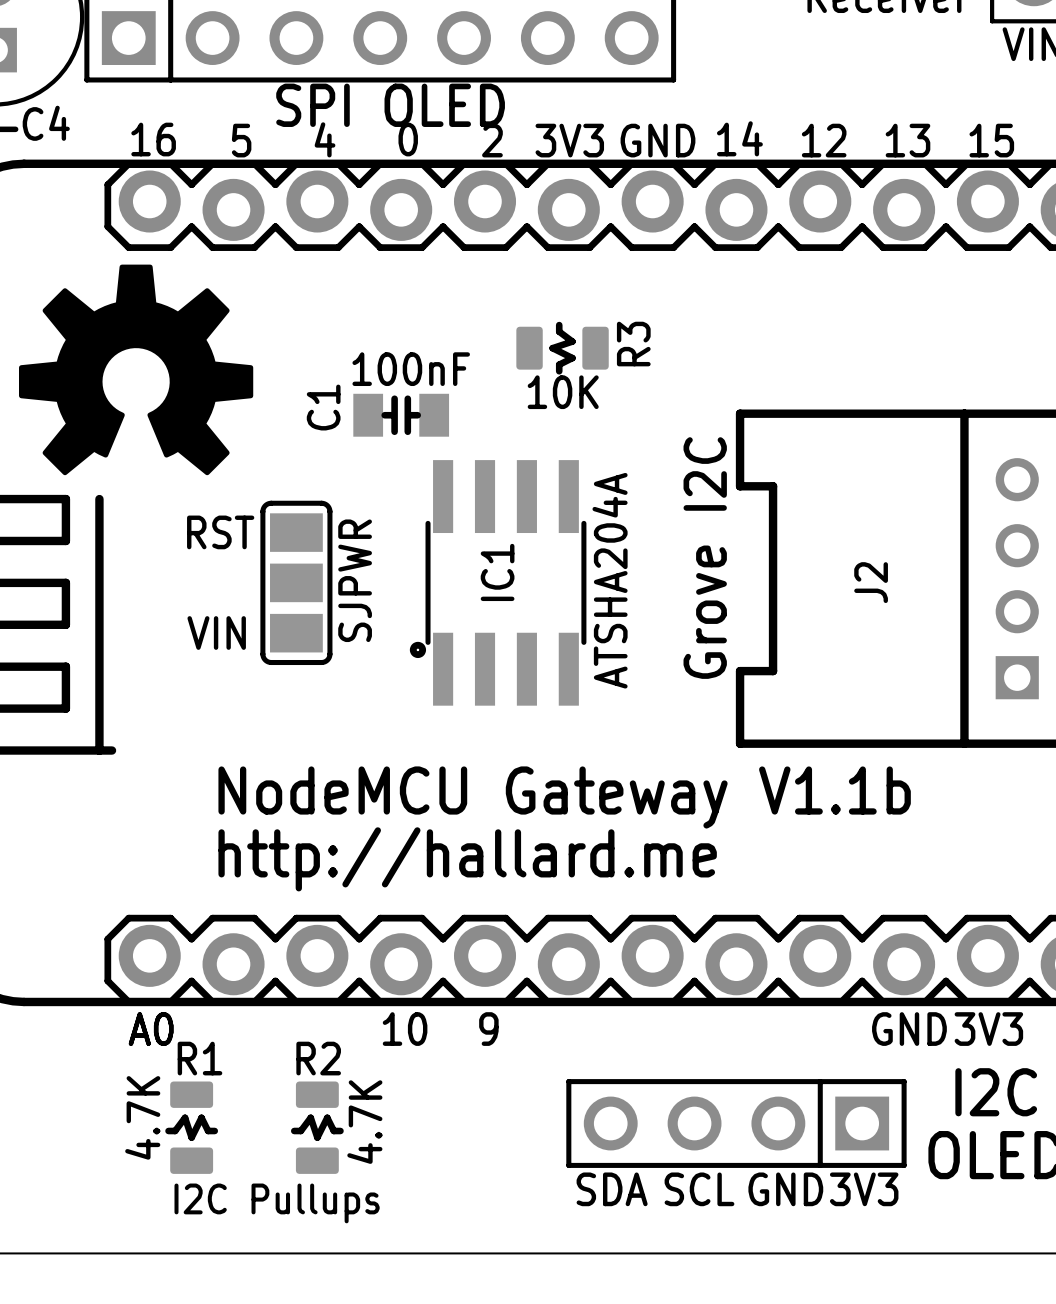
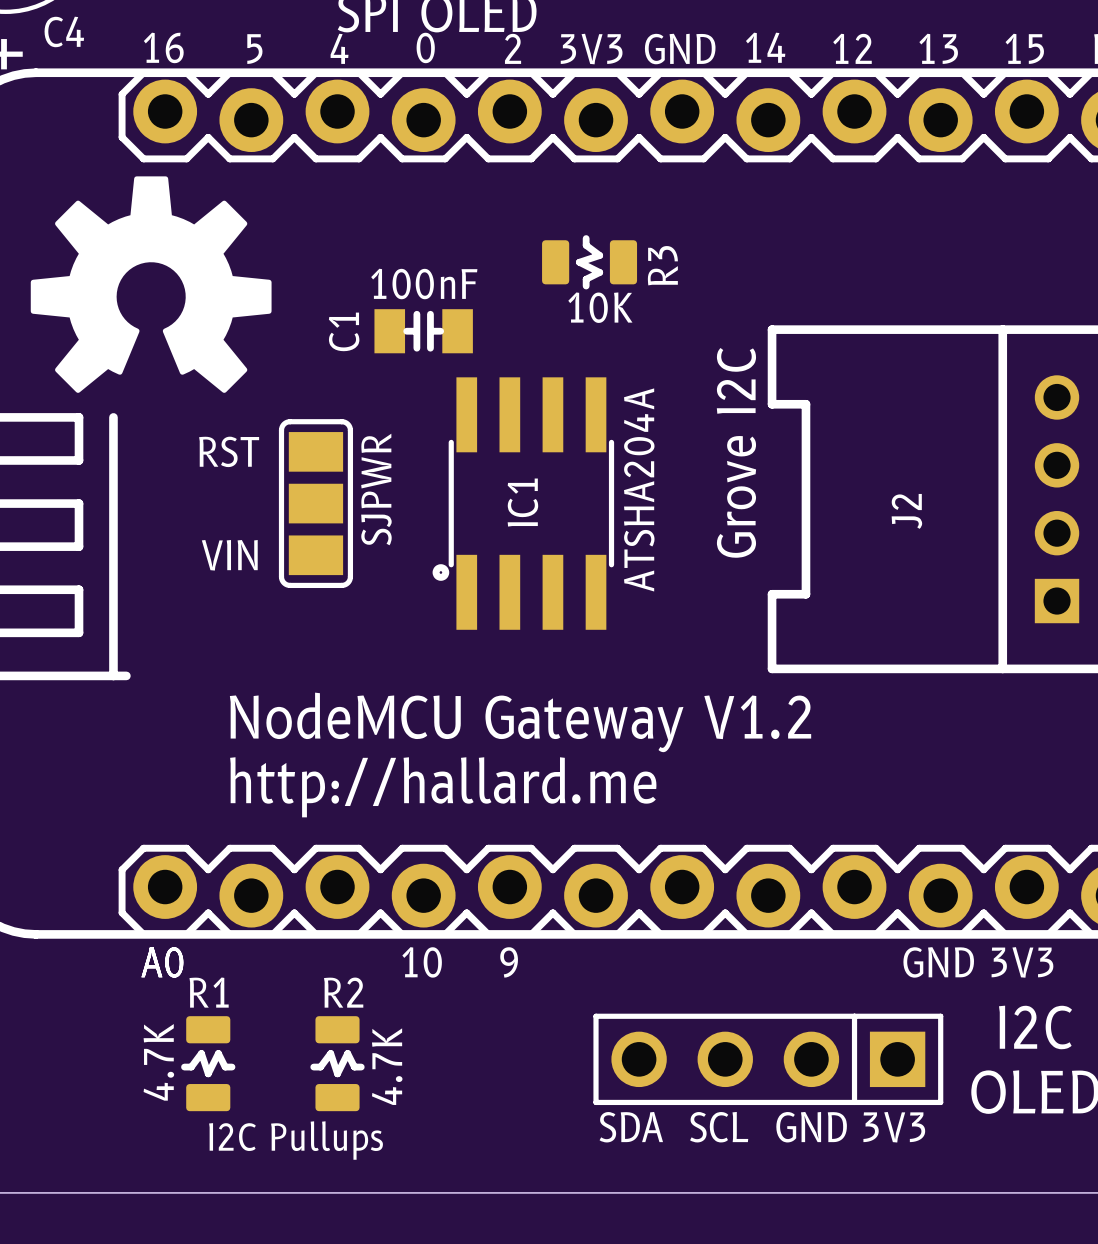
text: NodeMCU Gateway V1.1b (564, 797) -> NodeMCU Gateway V1.2 (520, 722)

